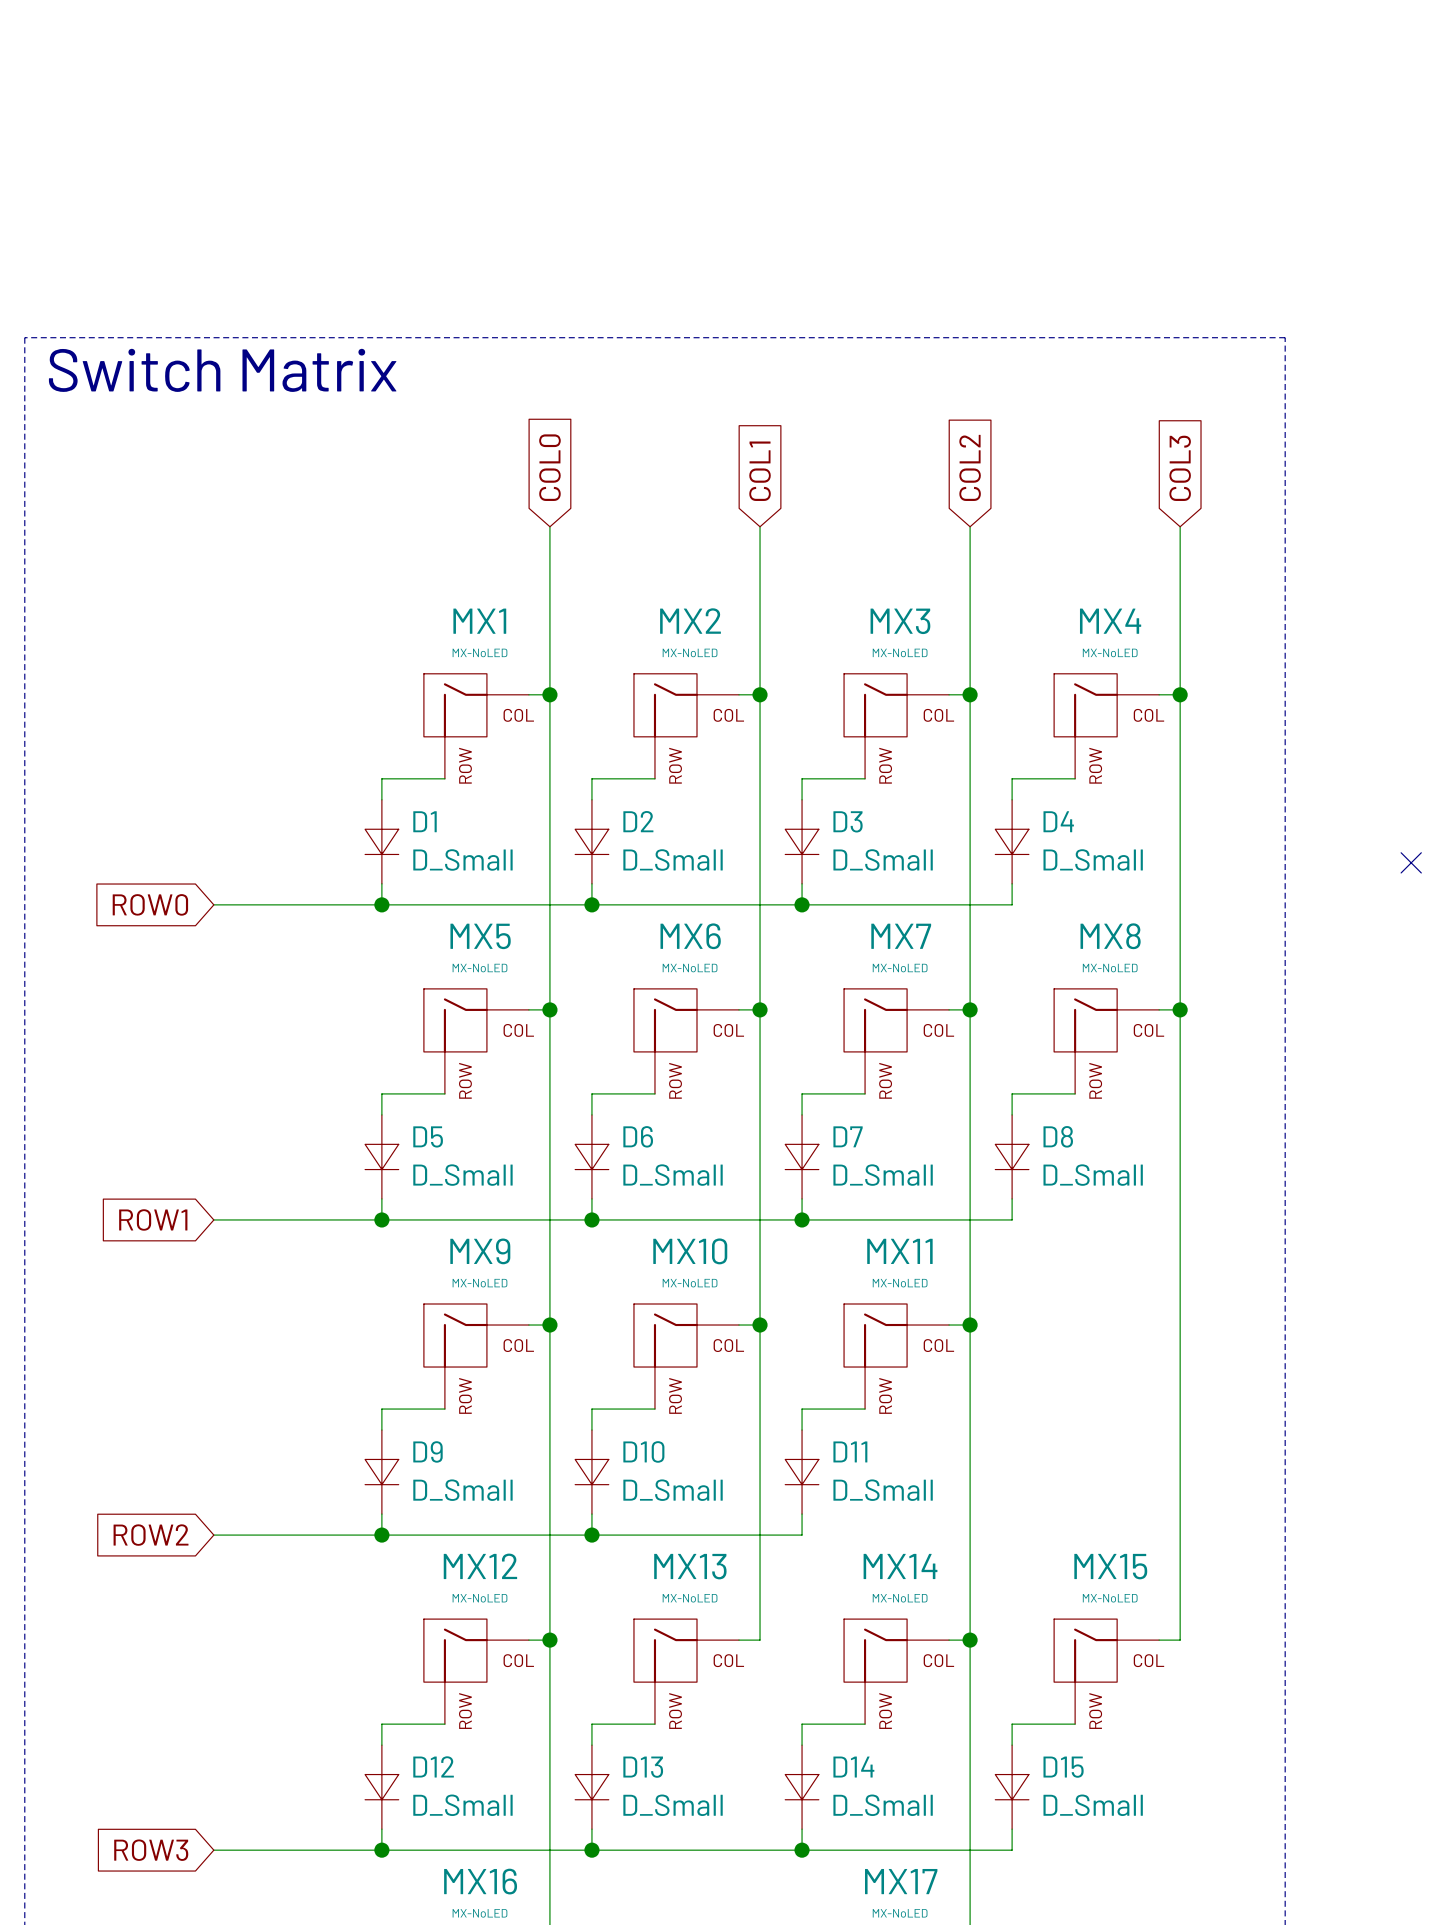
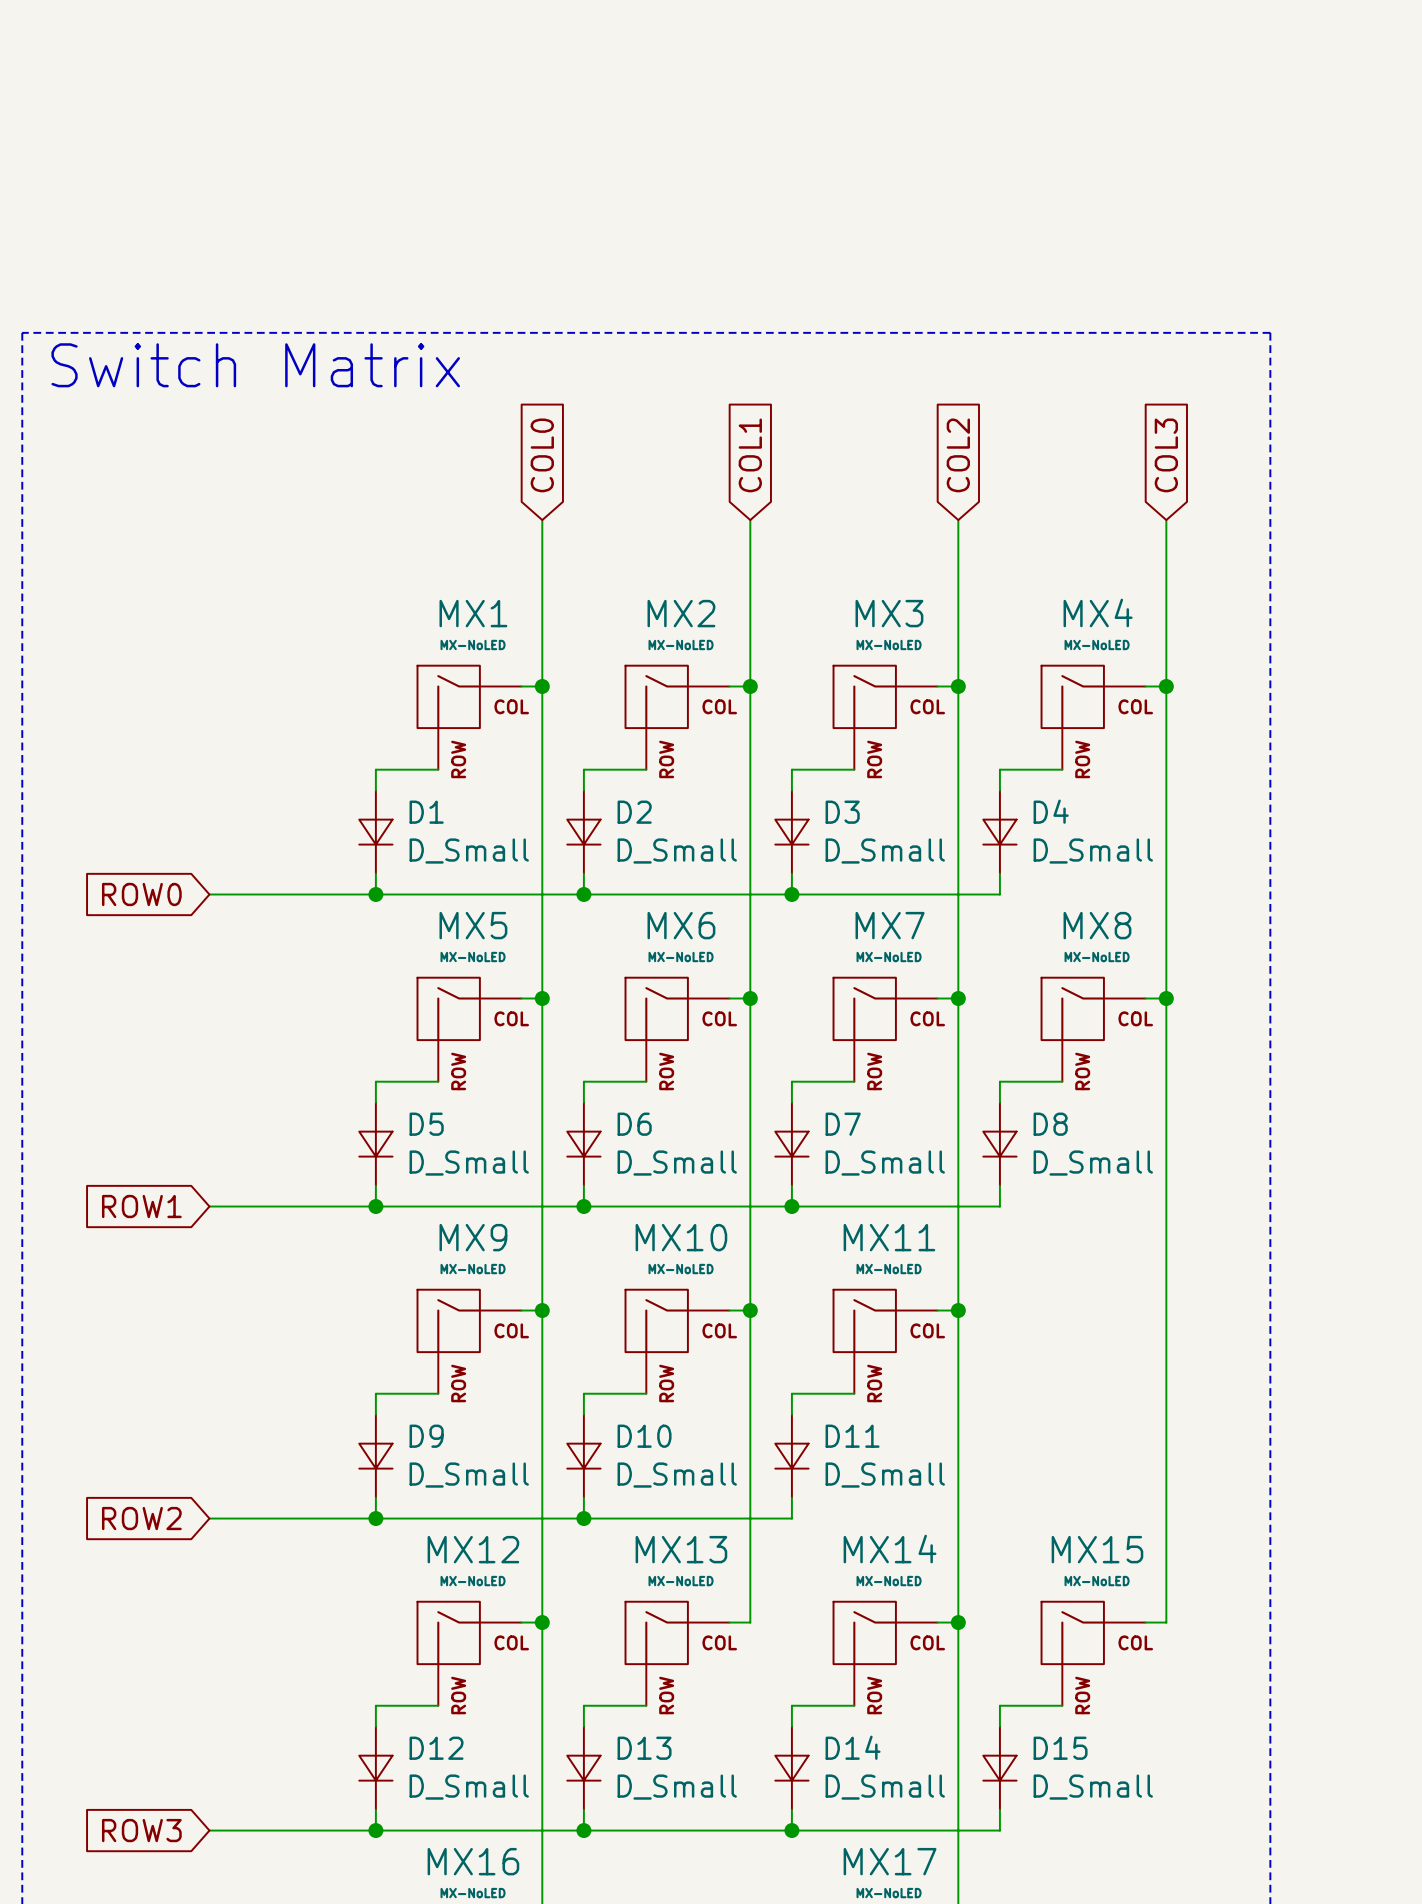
no-connect mark: (1411, 862) -> none

